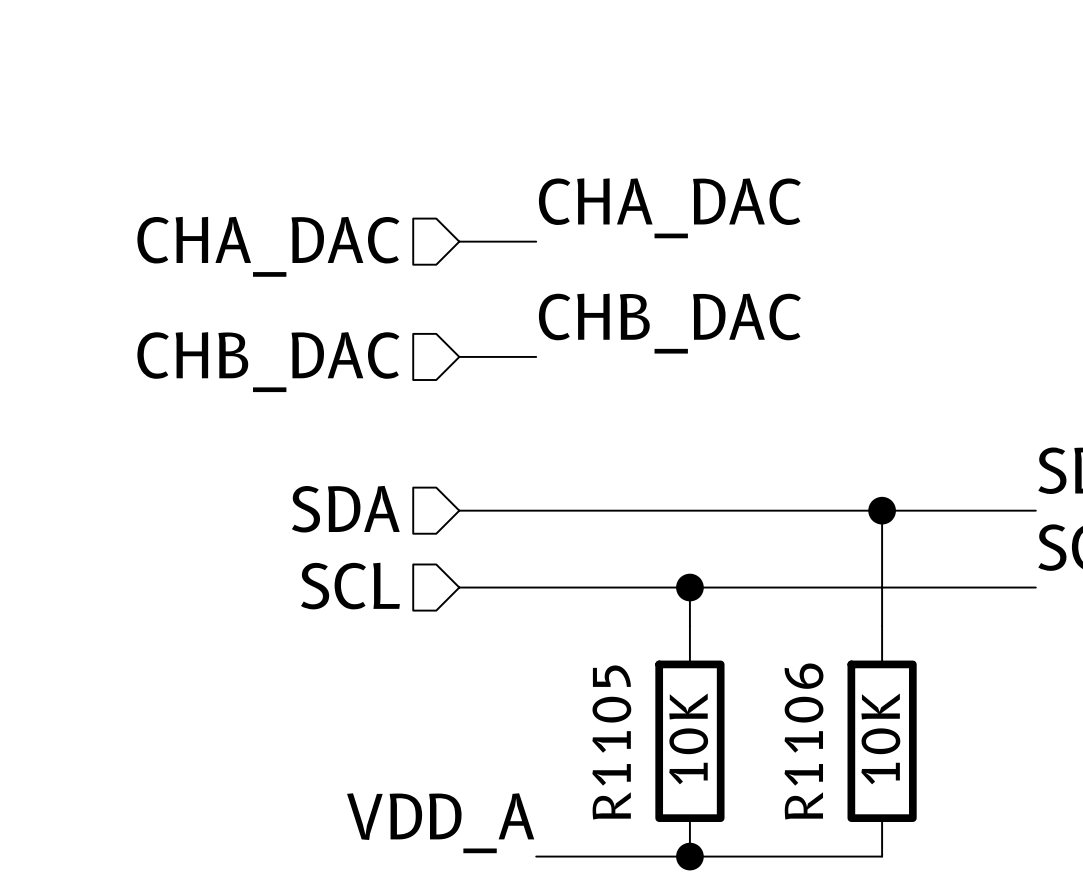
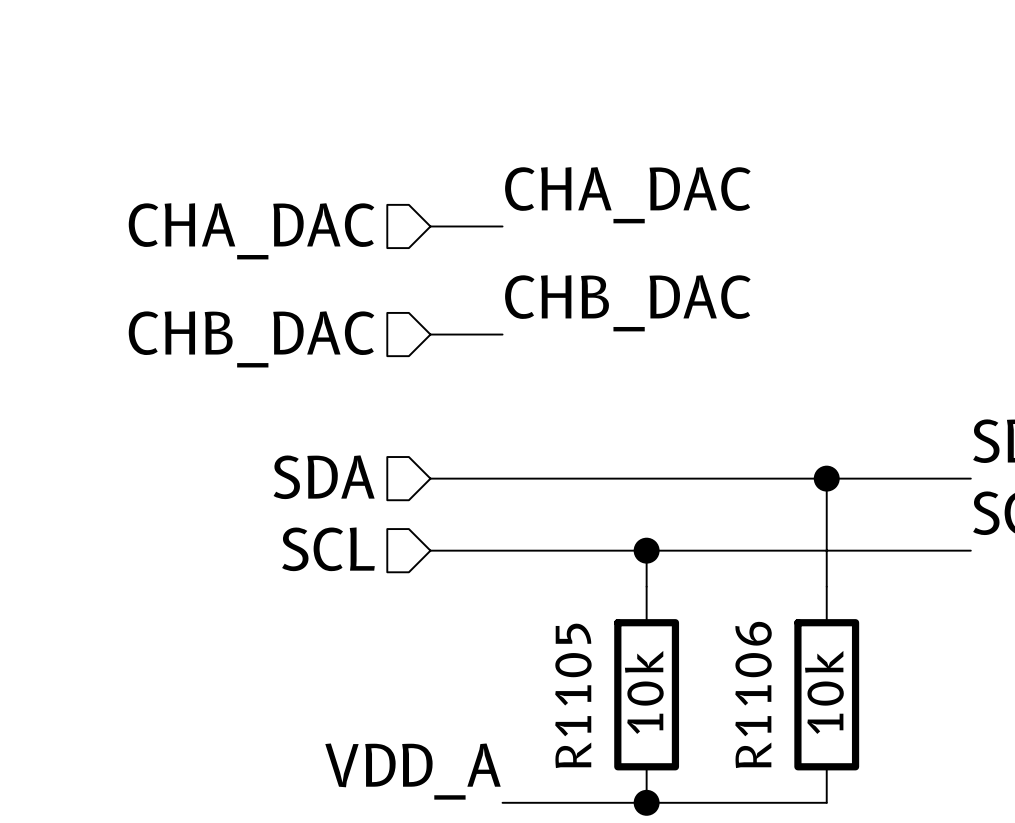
R1105 value: 10K (688, 738) -> 10k (644, 692)
R1106 value: 10K (880, 738) -> 10k (824, 692)

